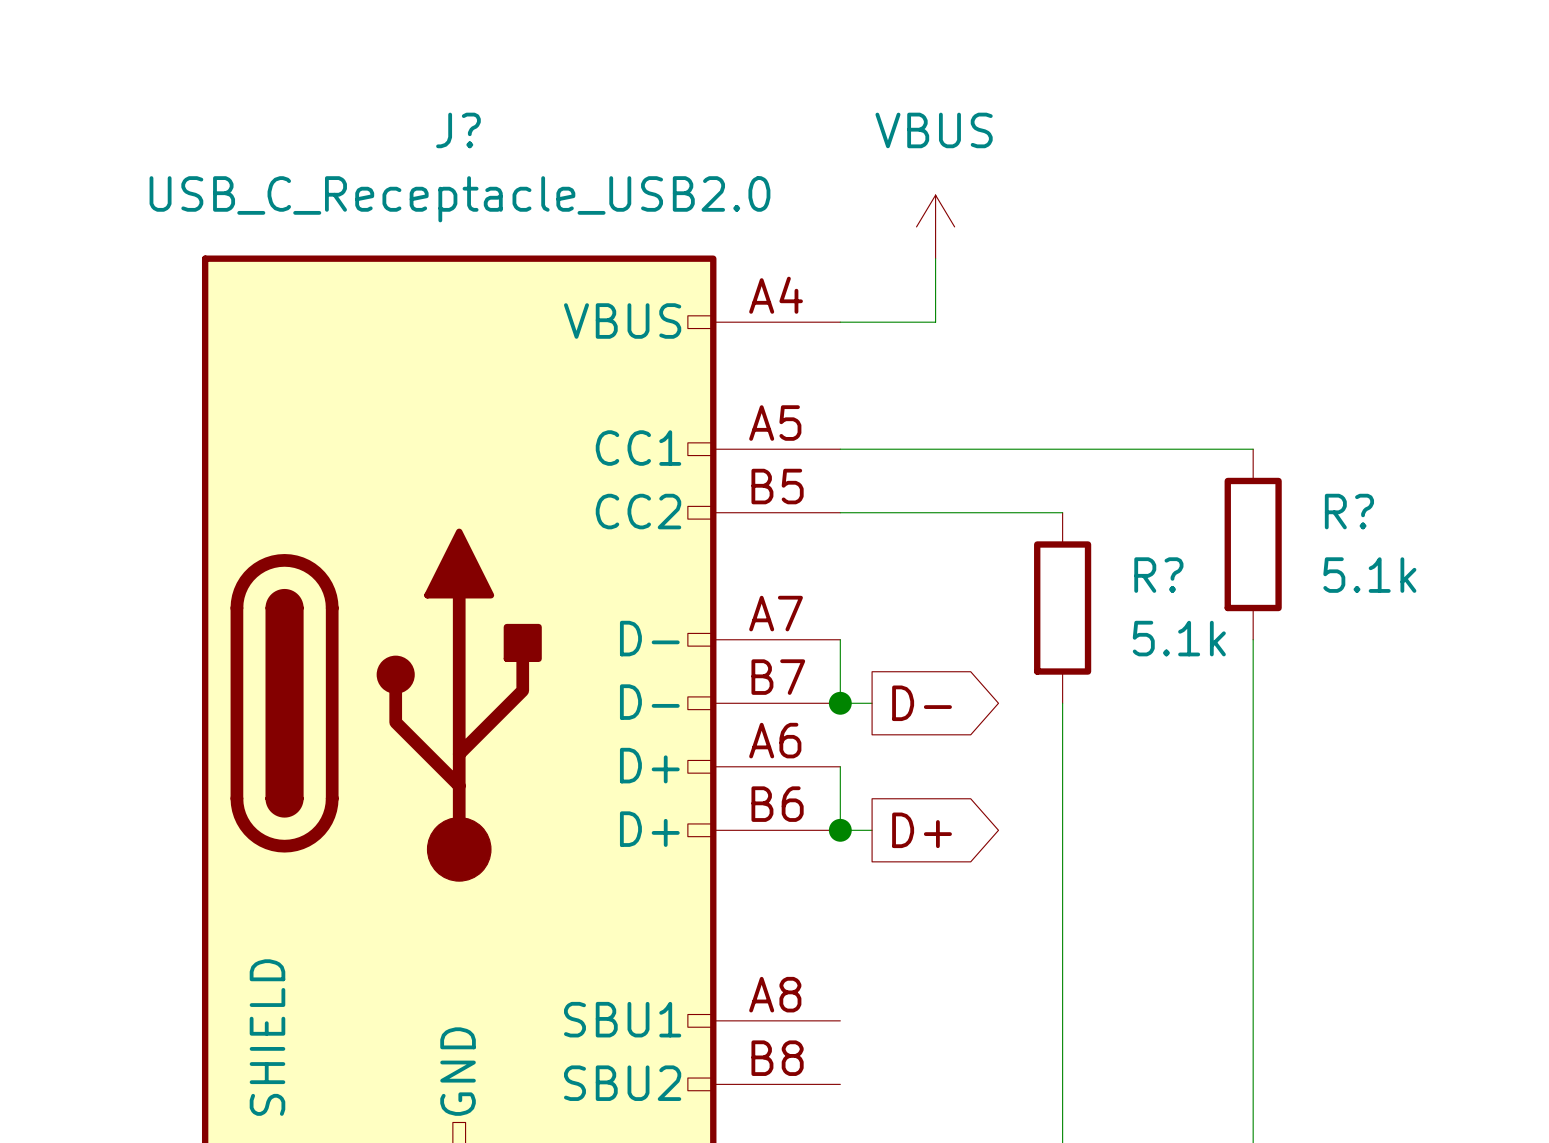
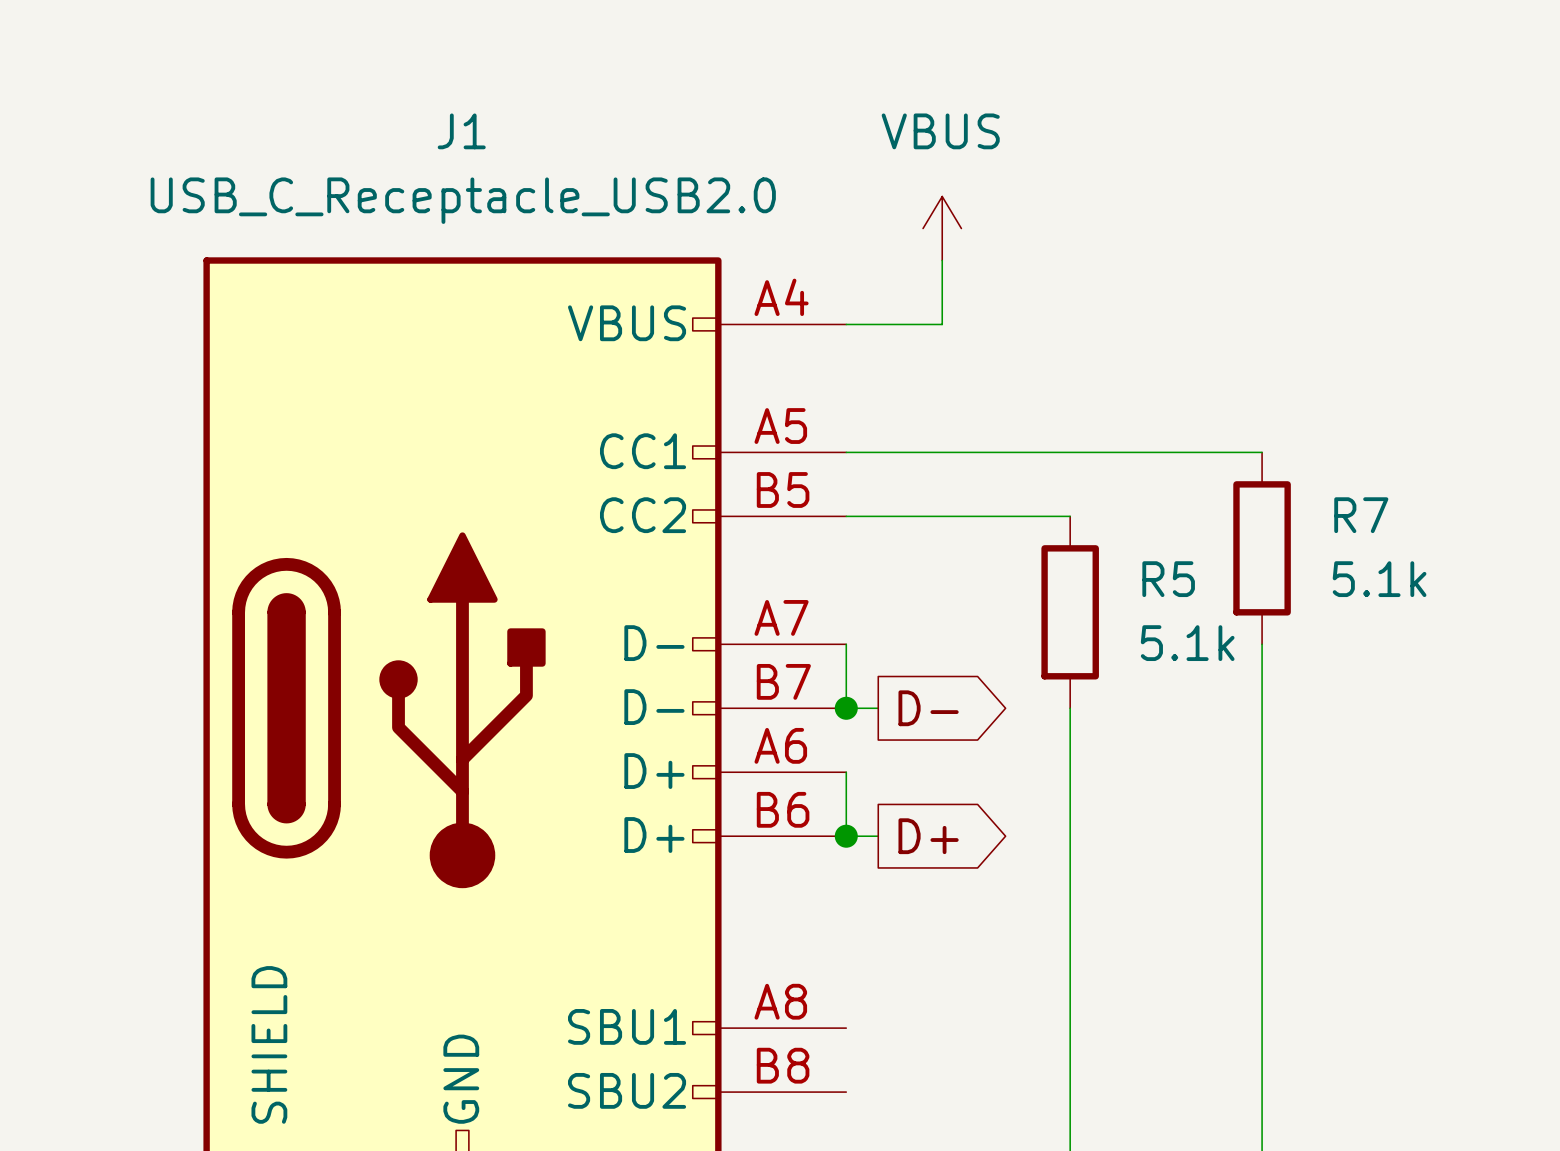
J? name: J? (458, 130) -> J1 (461, 131)
R? name: R? (1349, 511) -> R7 (1361, 515)
R? name: R? (1158, 575) -> R5 (1168, 579)

